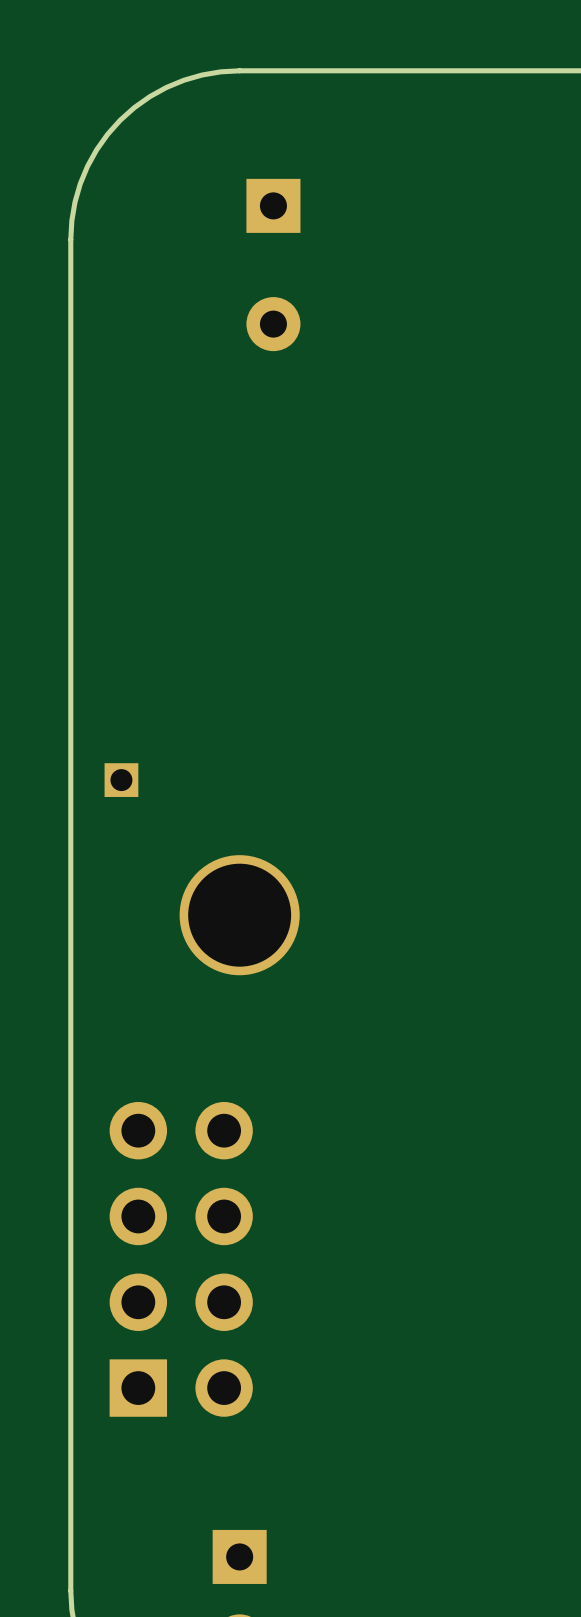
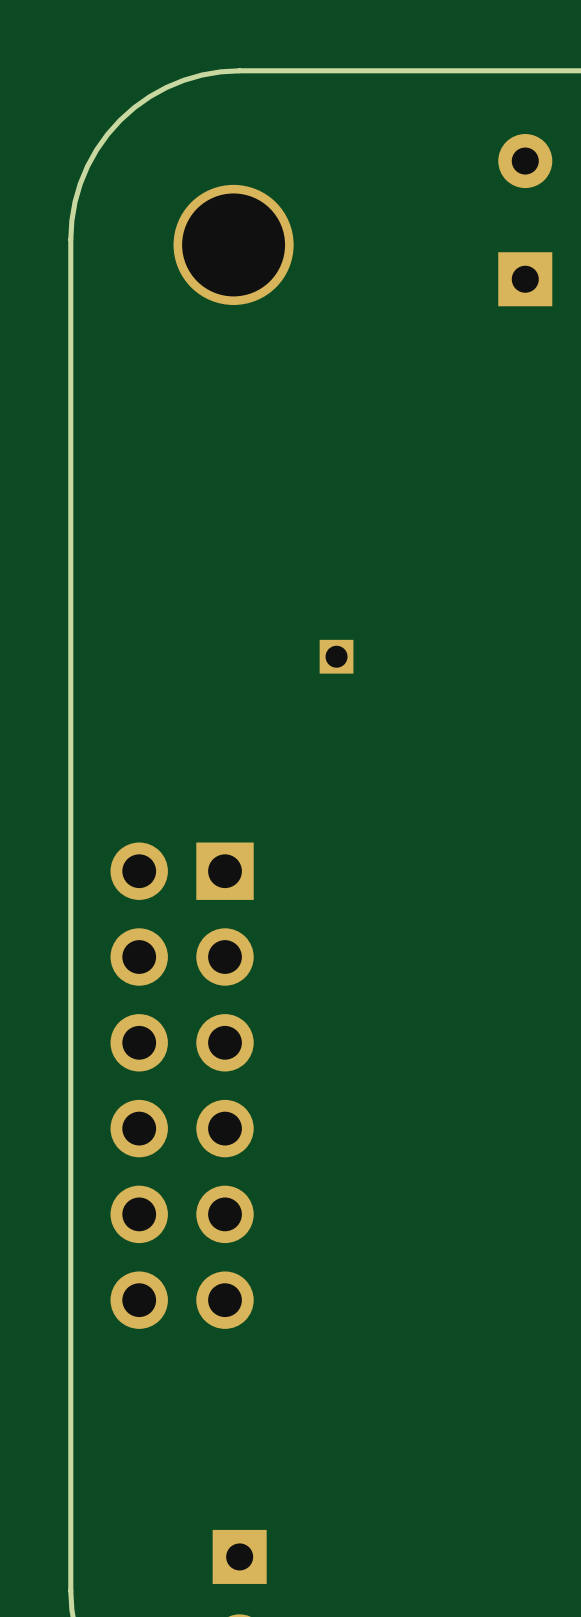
part rotation: 0° (273, 264) -> 180° (525, 220)
part position: (273, 264) -> (525, 220)
part position: (121, 780) -> (336, 656)
part position: (239, 915) -> (233, 244)
part: none -> (182, 1085)
part: (181, 1259) -> none

